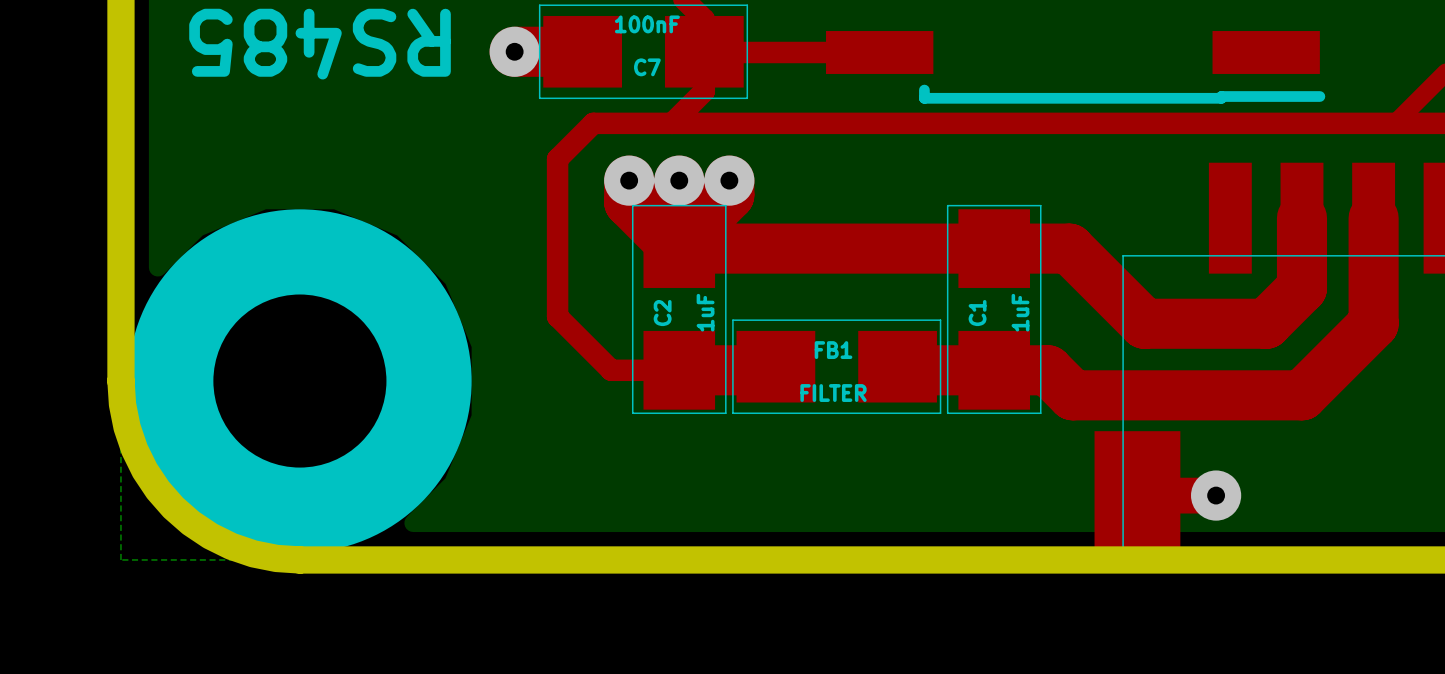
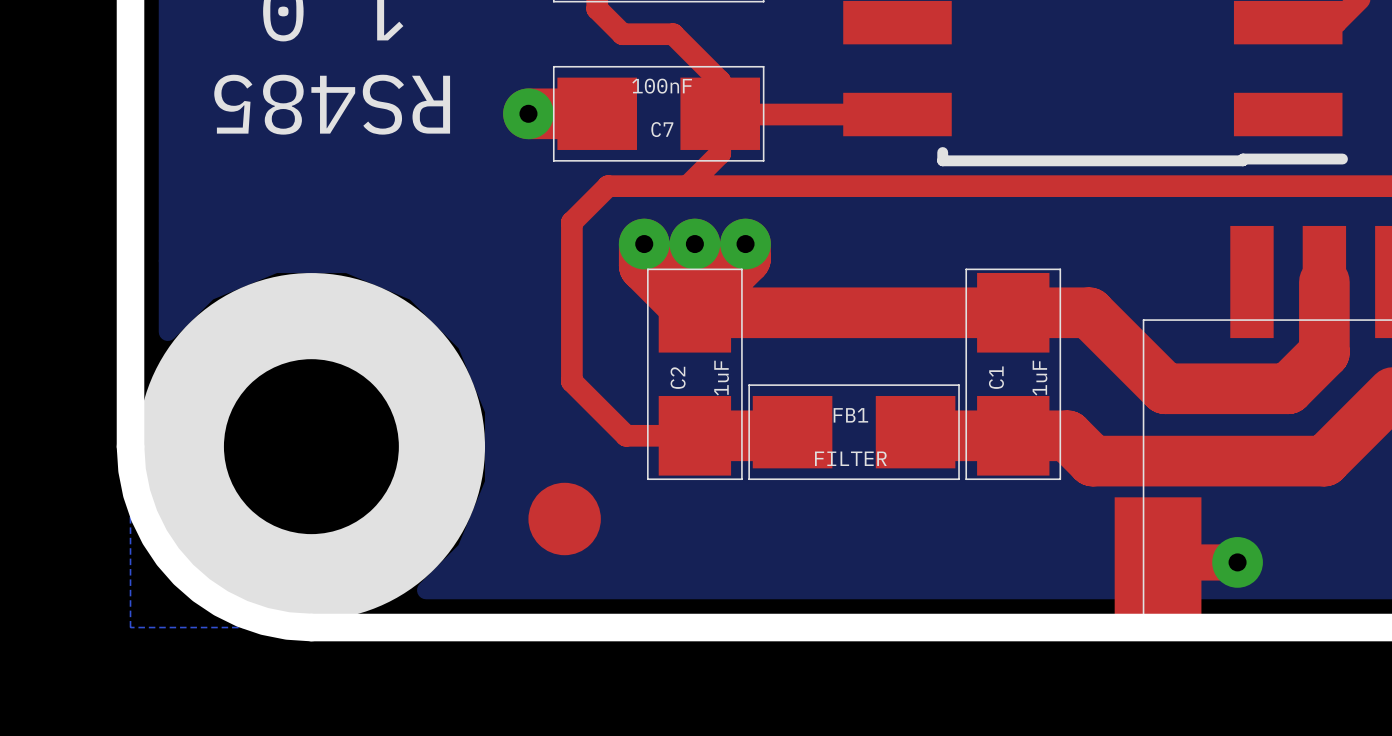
part: none -> (564, 519)

